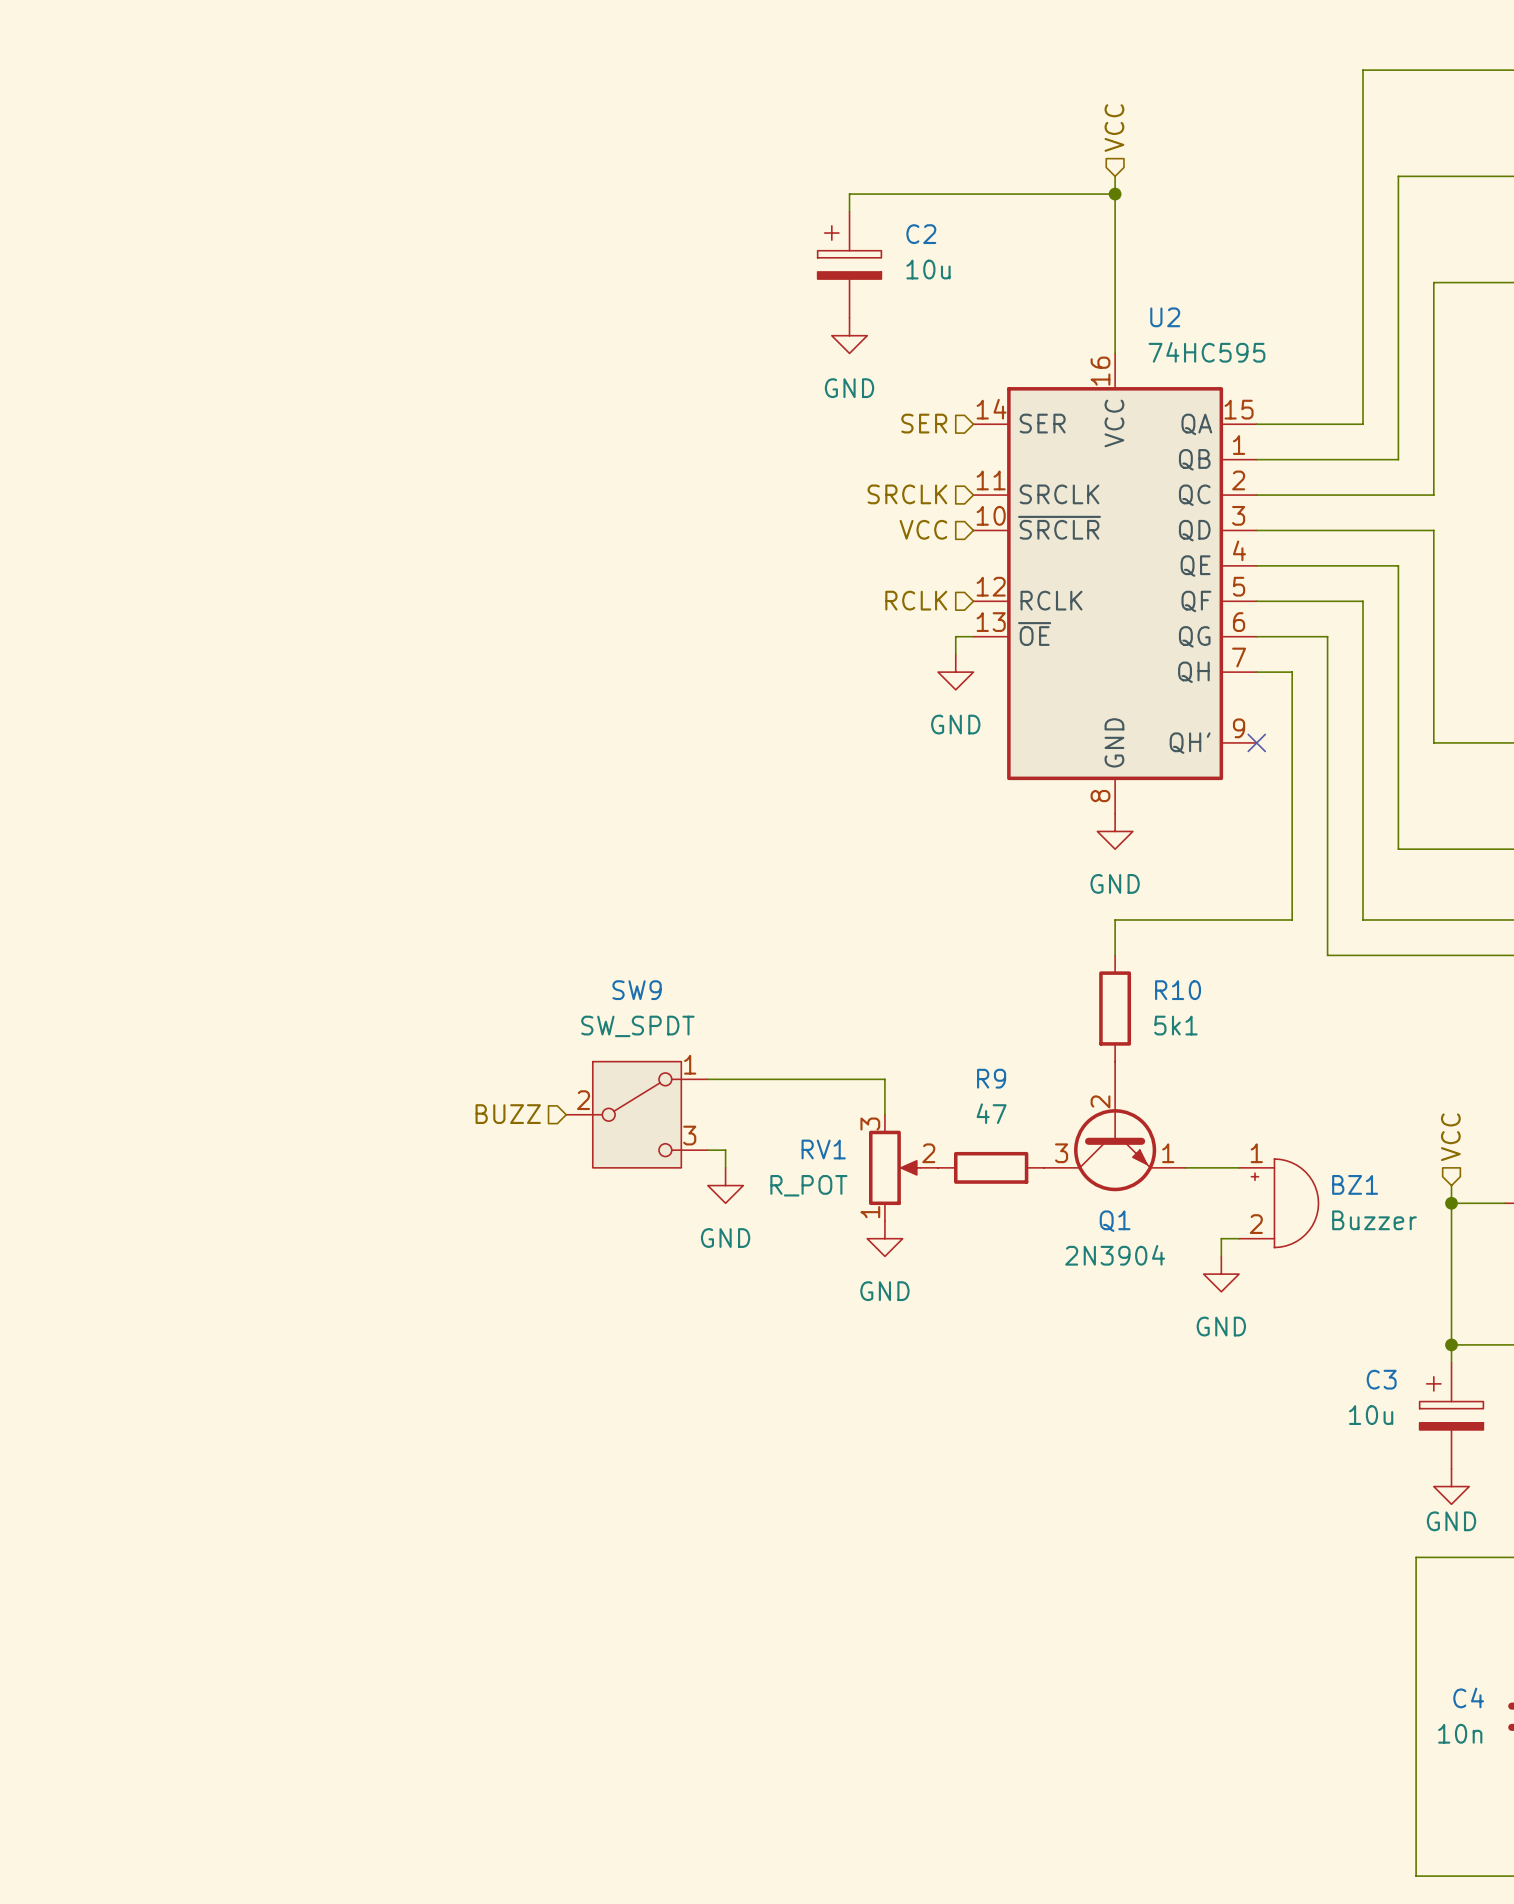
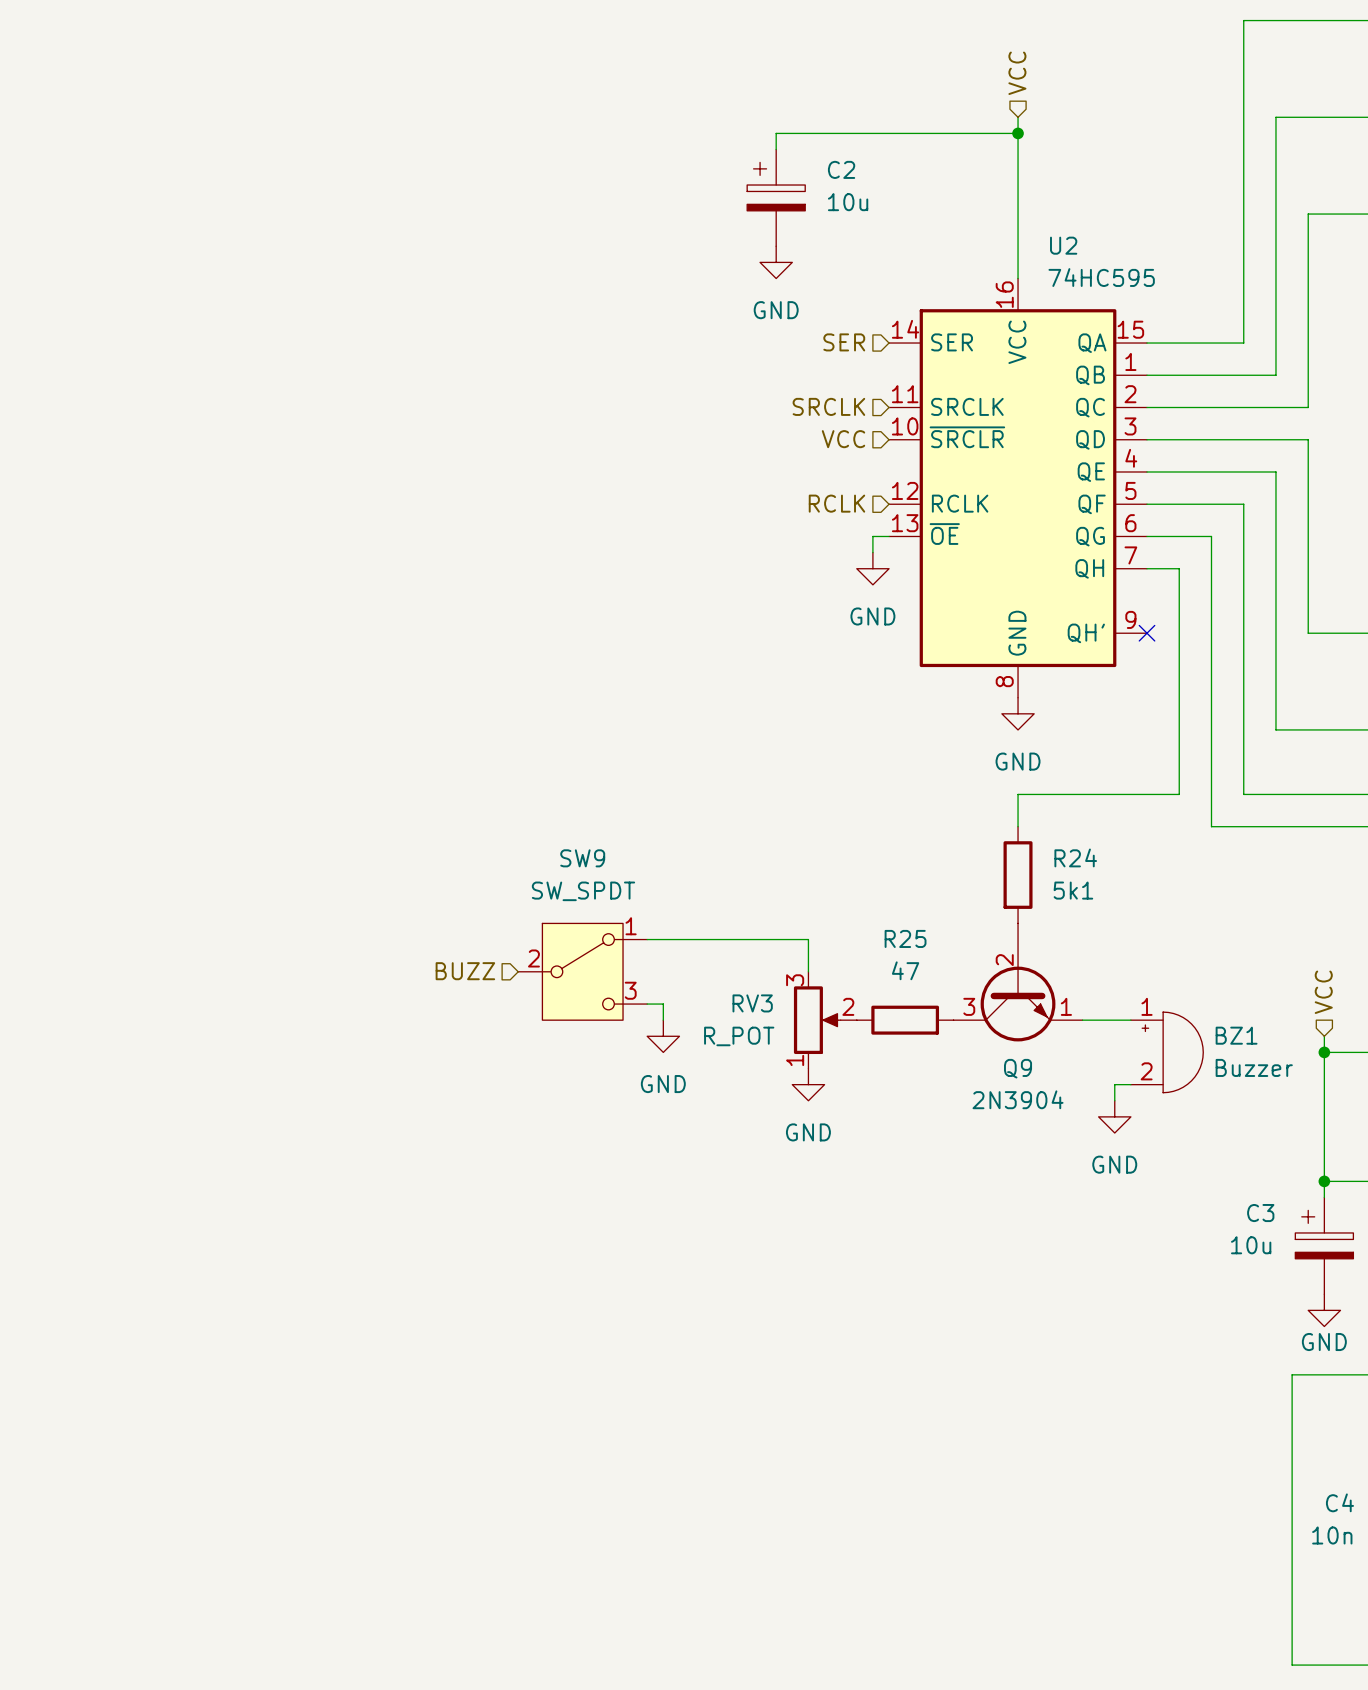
R10 name: R10 (1178, 990) -> R24 (1075, 857)
R9 name: R9 (991, 1078) -> R25 (905, 938)
RV1 name: RV1 (823, 1149) -> RV3 (752, 1003)
Q1 name: Q1 (1115, 1221) -> Q9 (1018, 1068)

